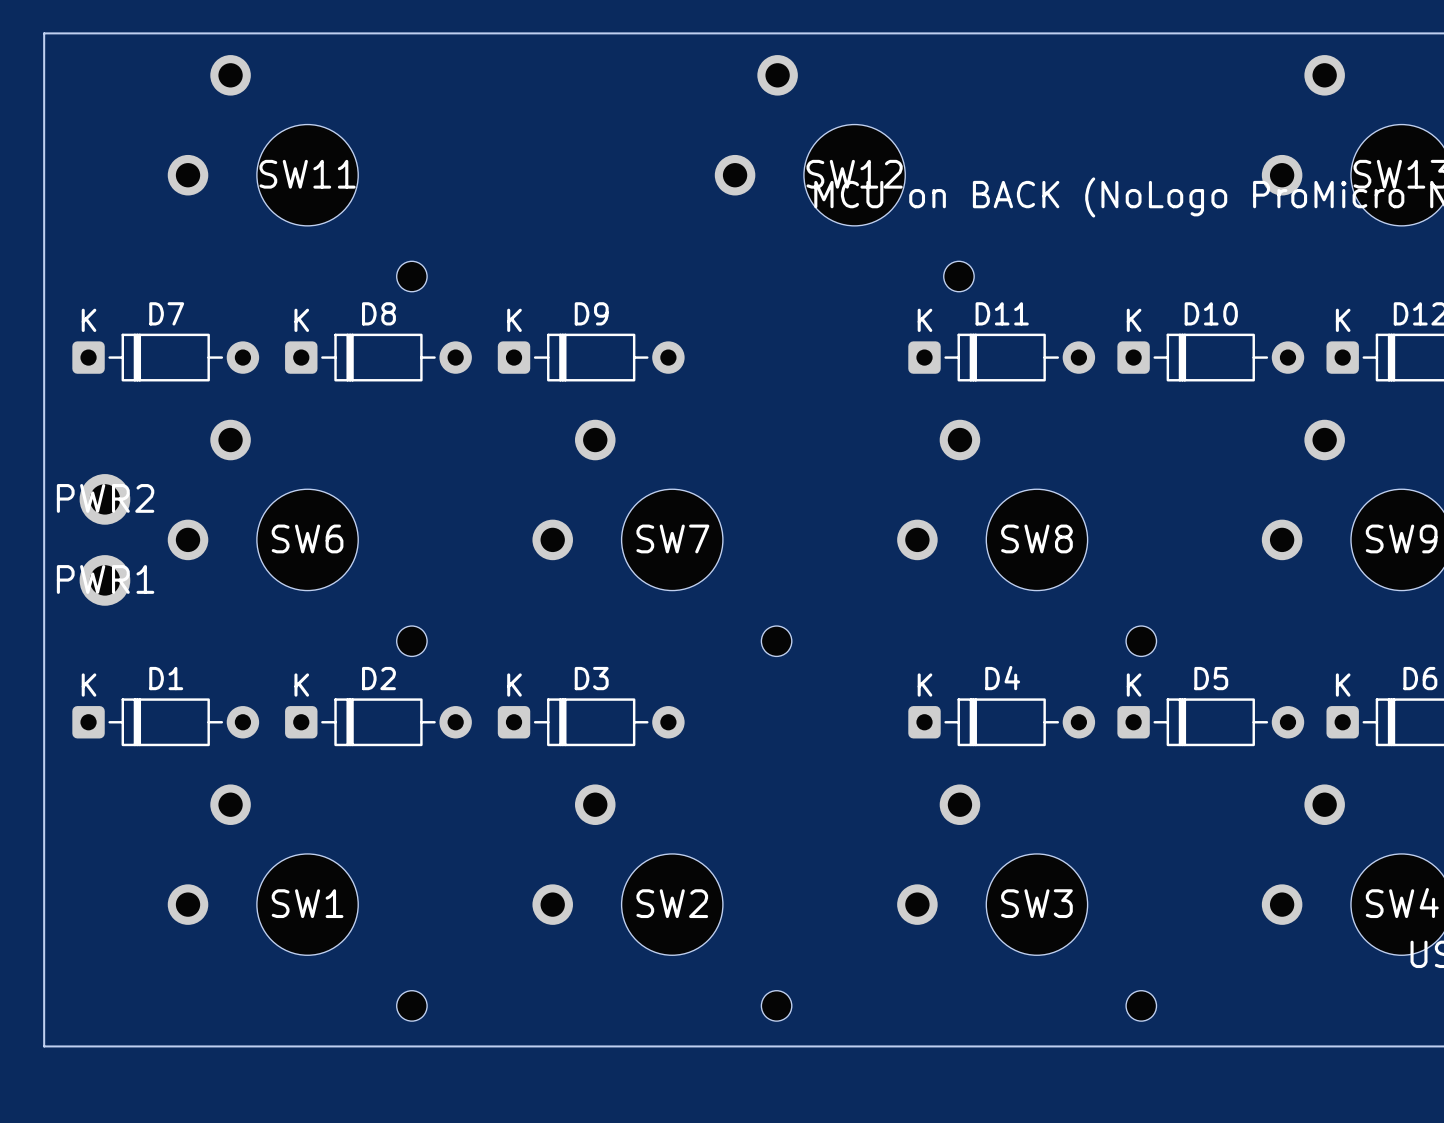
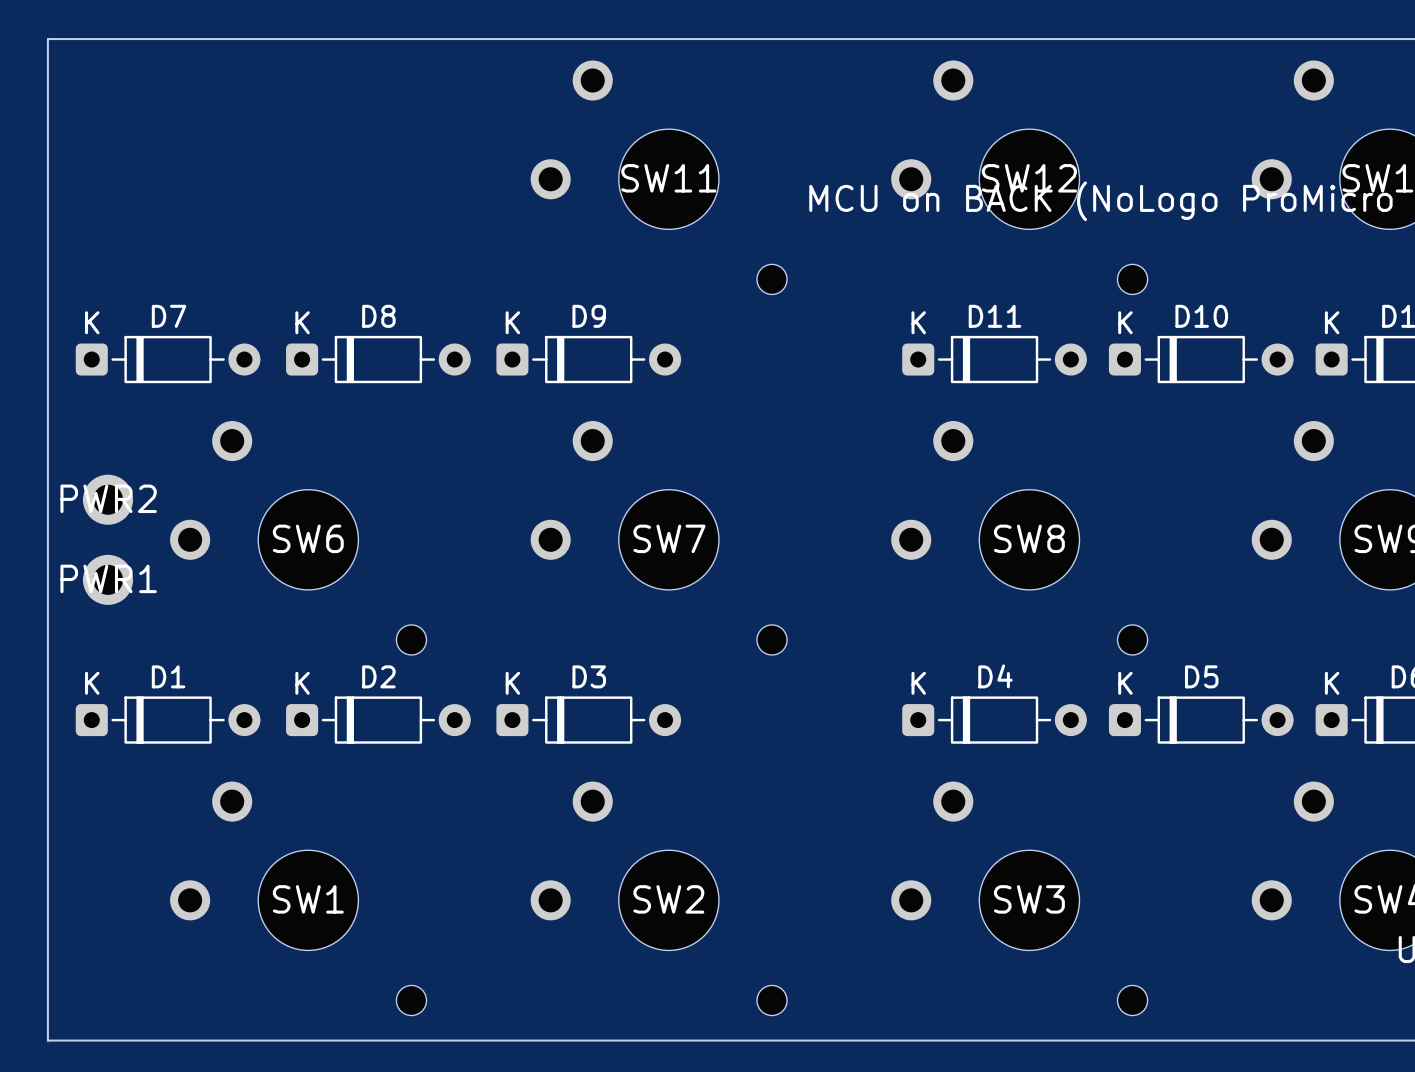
SW11 position: (297, 173) -> (658, 177)
SW12 position: (844, 173) -> (1019, 177)

